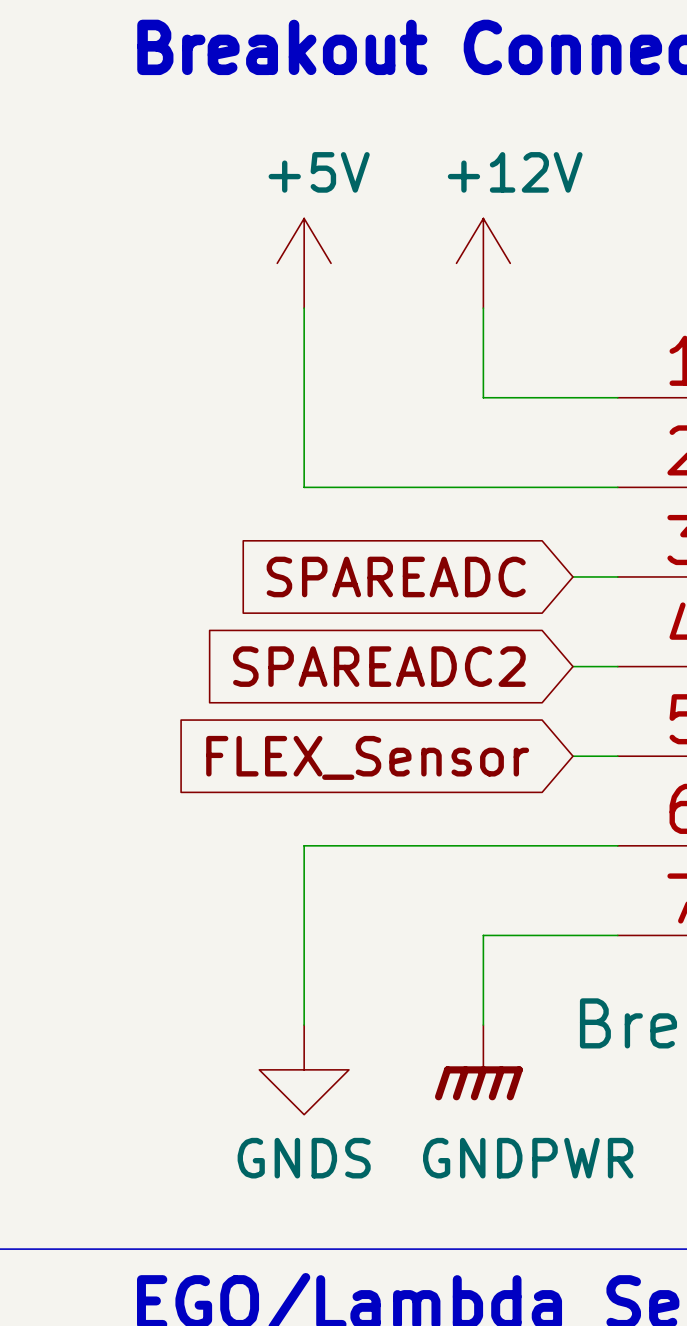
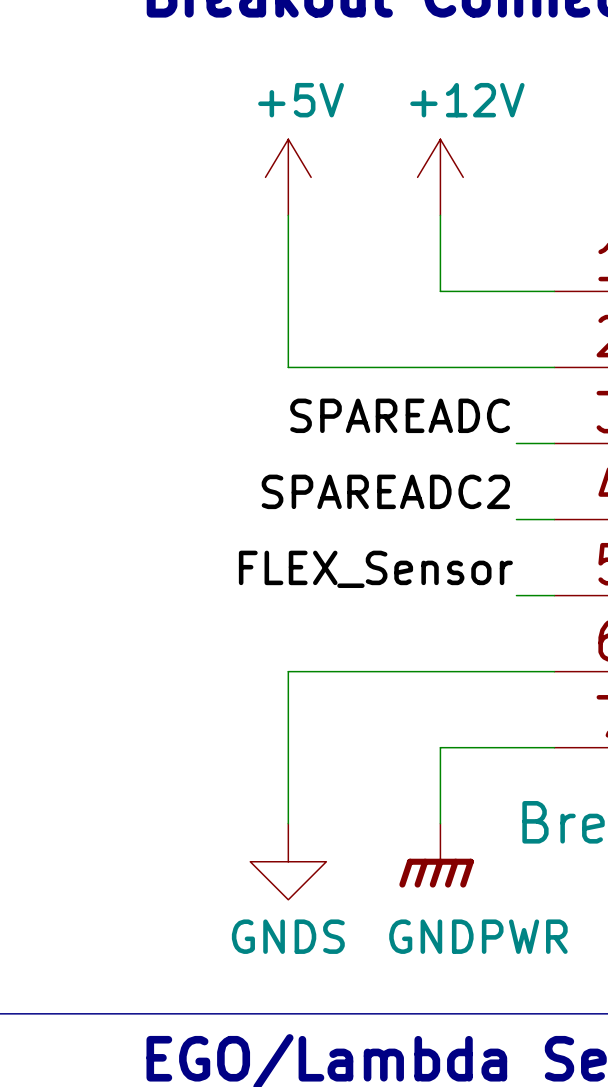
label: none -> SPAREADC (400, 415)
global label: SPAREADC (396, 576) -> none
label: none -> SPAREADC2 (385, 491)
global label: SPAREADC2 (379, 666) -> none
label: none -> FLEX_Sensor (375, 569)
global label: FLEX_Sensor (367, 757) -> none

